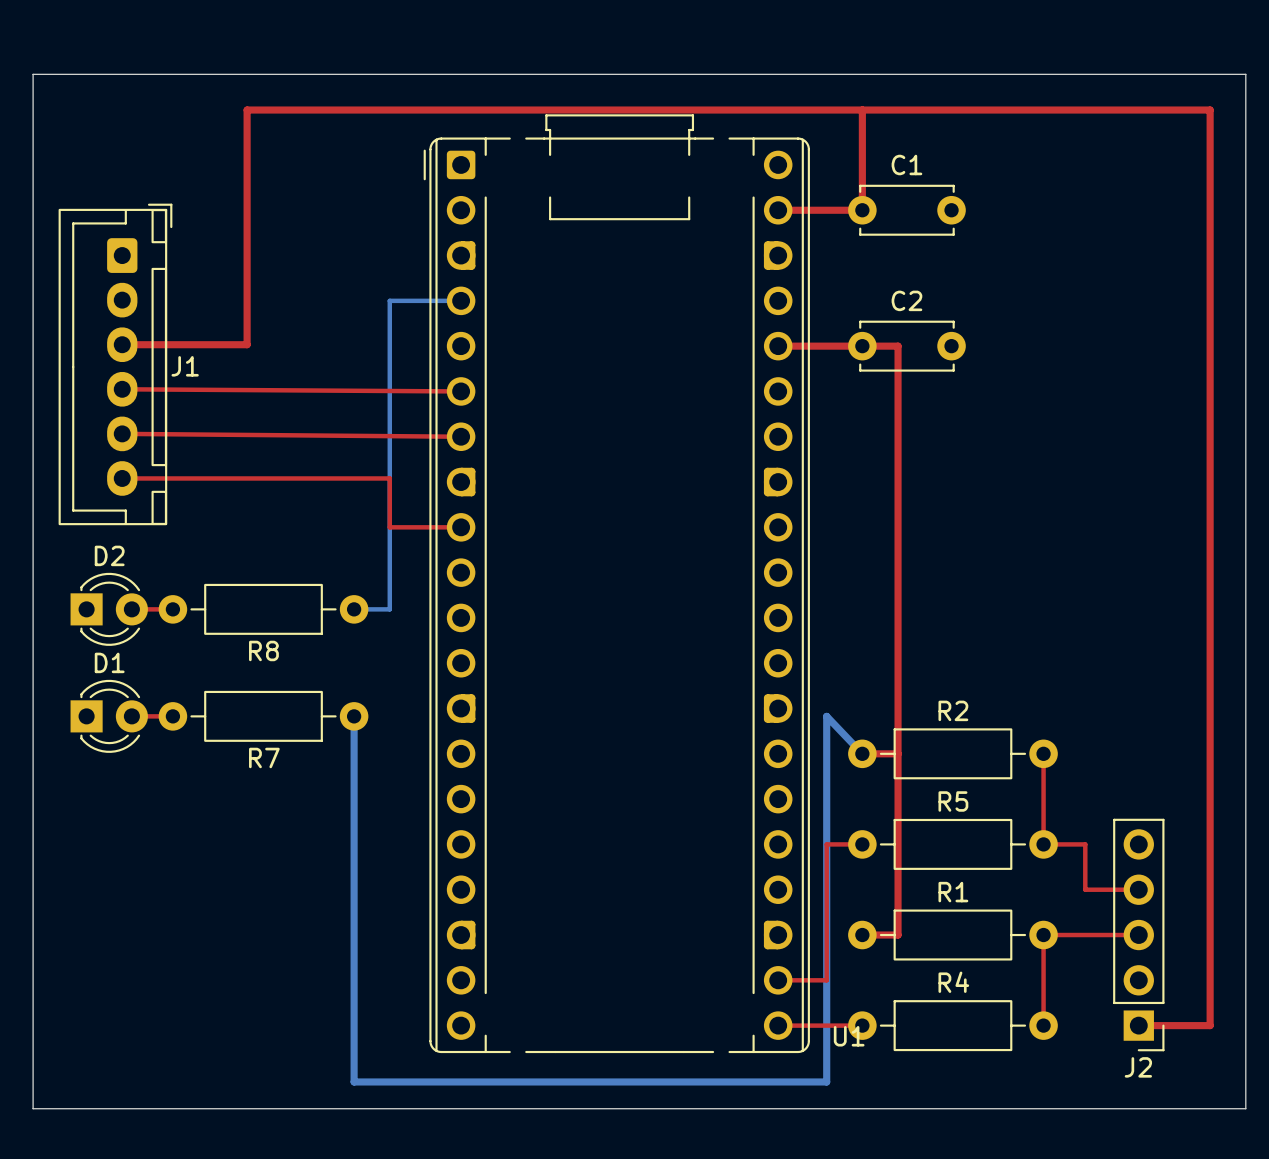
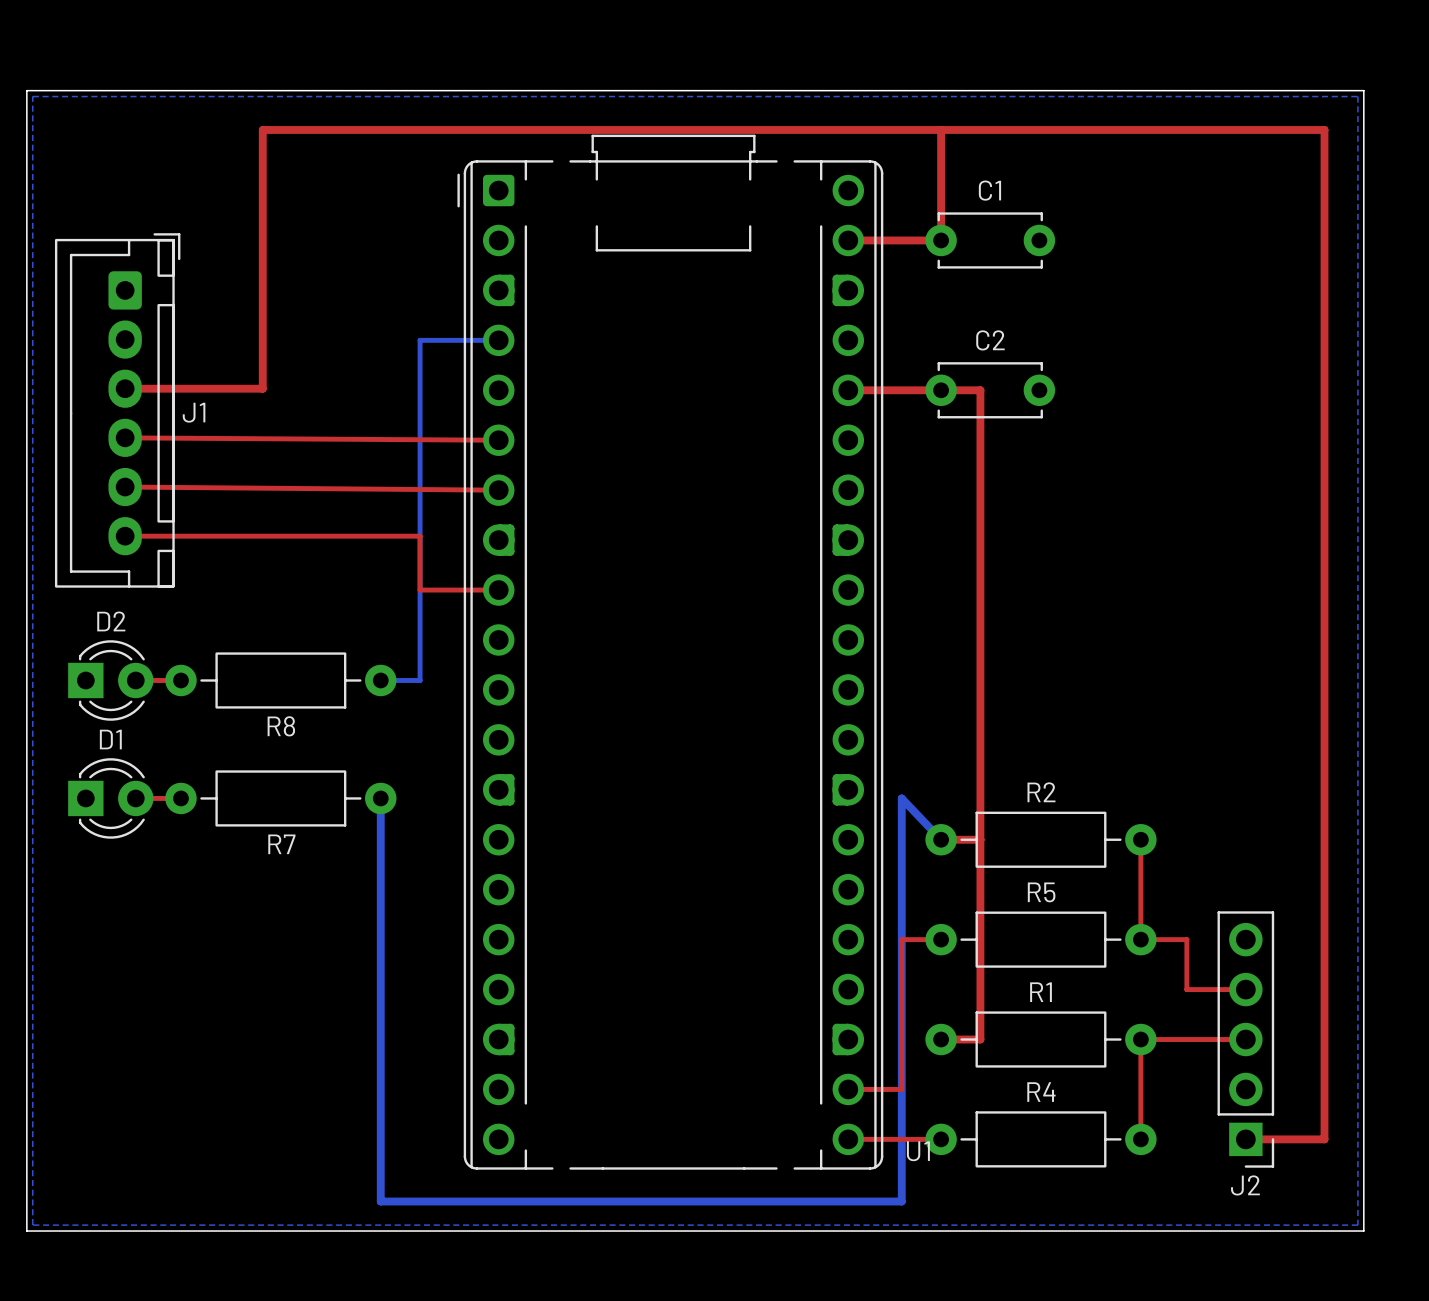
bottom zone outline: none -> (32, 96) (1357, 96) (1357, 1225) (32, 1225) (32, 96)

